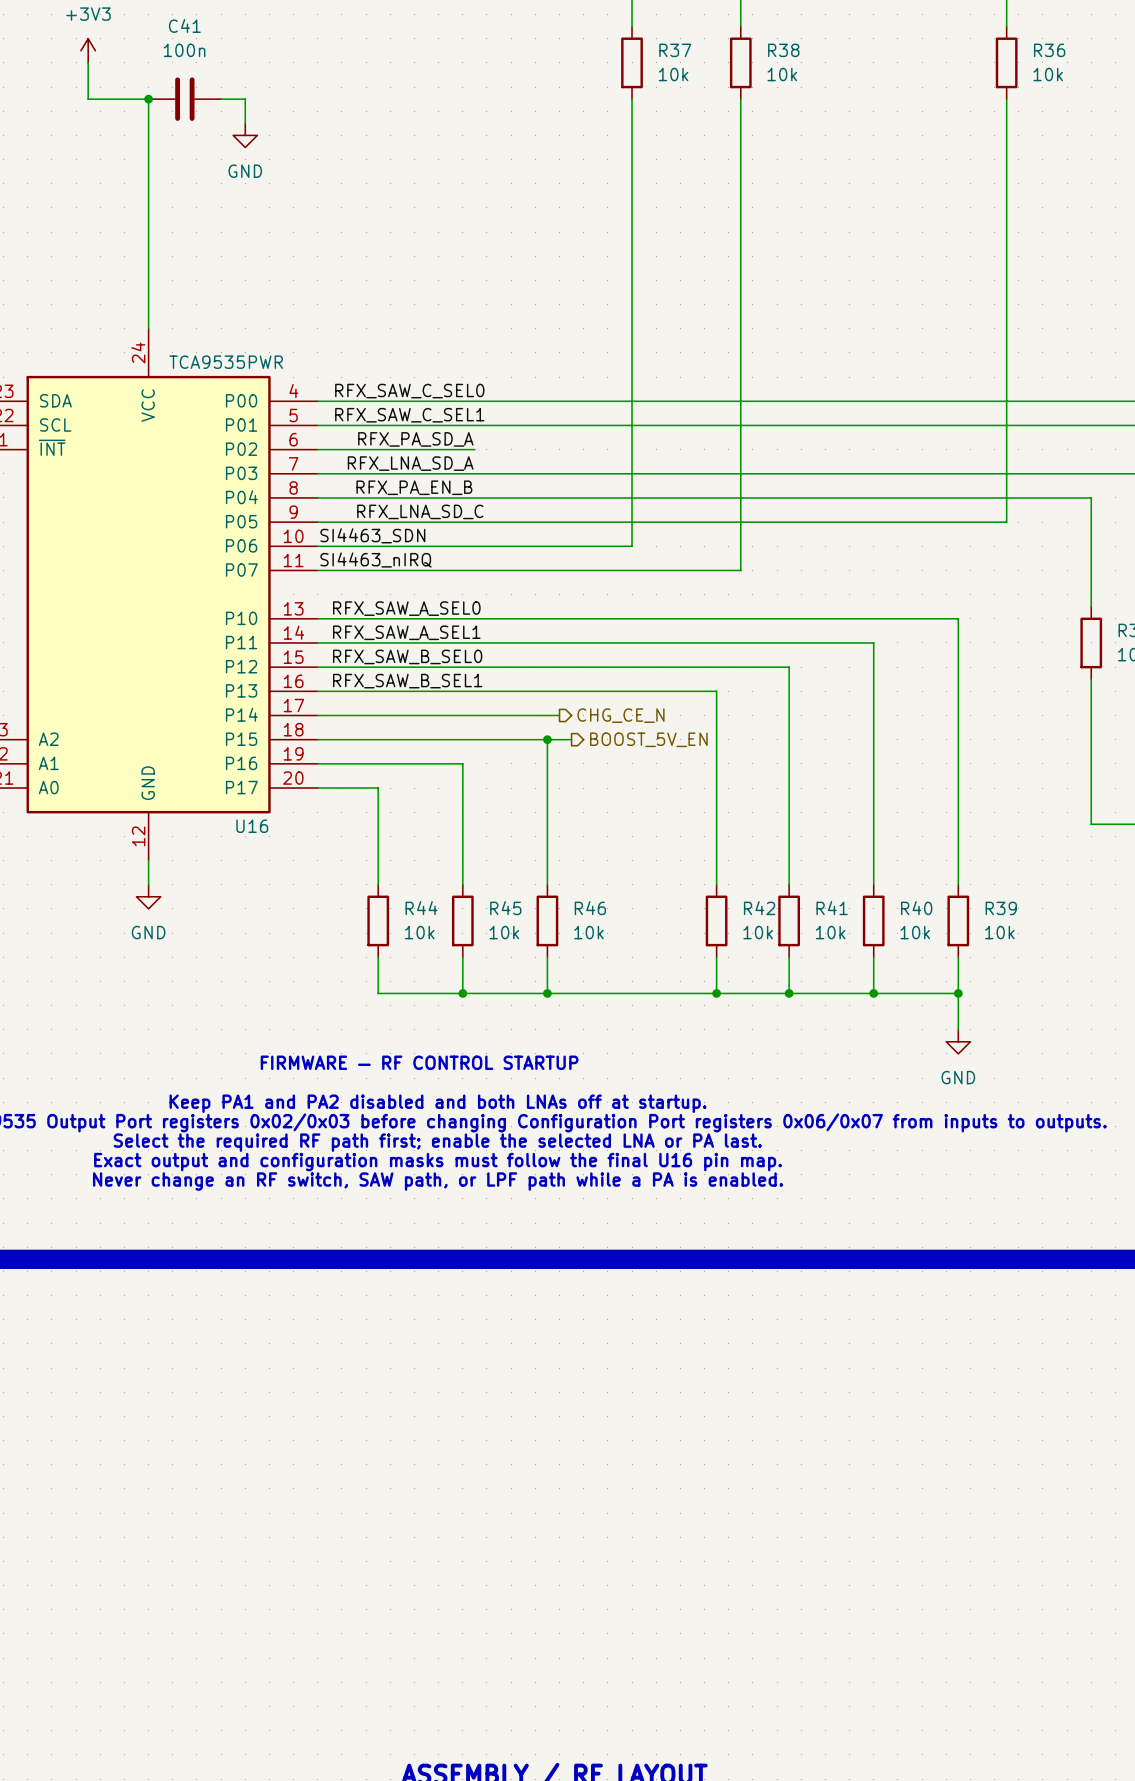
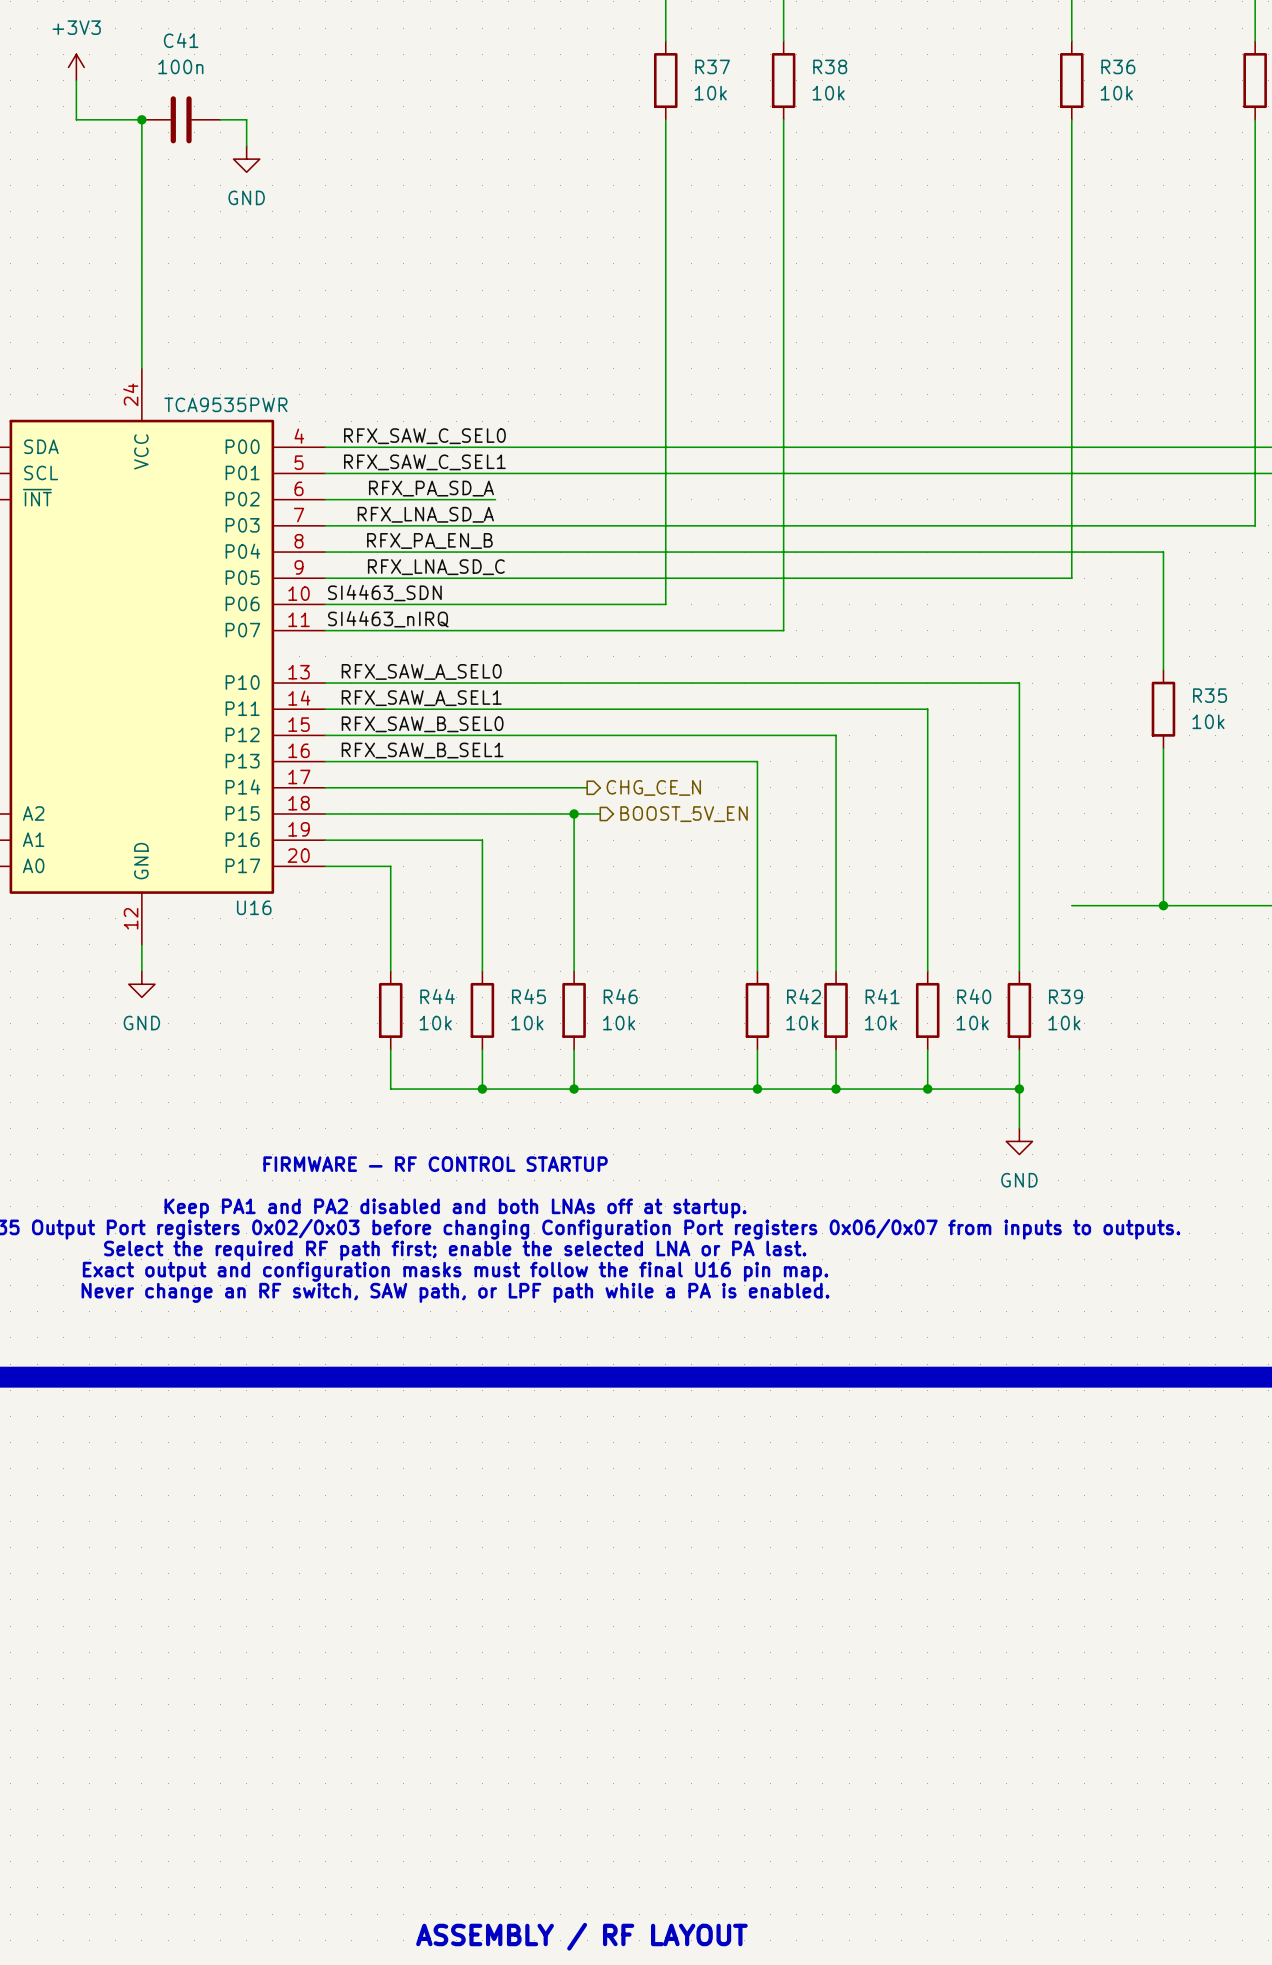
wire: none -> (1071, 905) (1163, 905)
junction: none -> (1163, 905)

